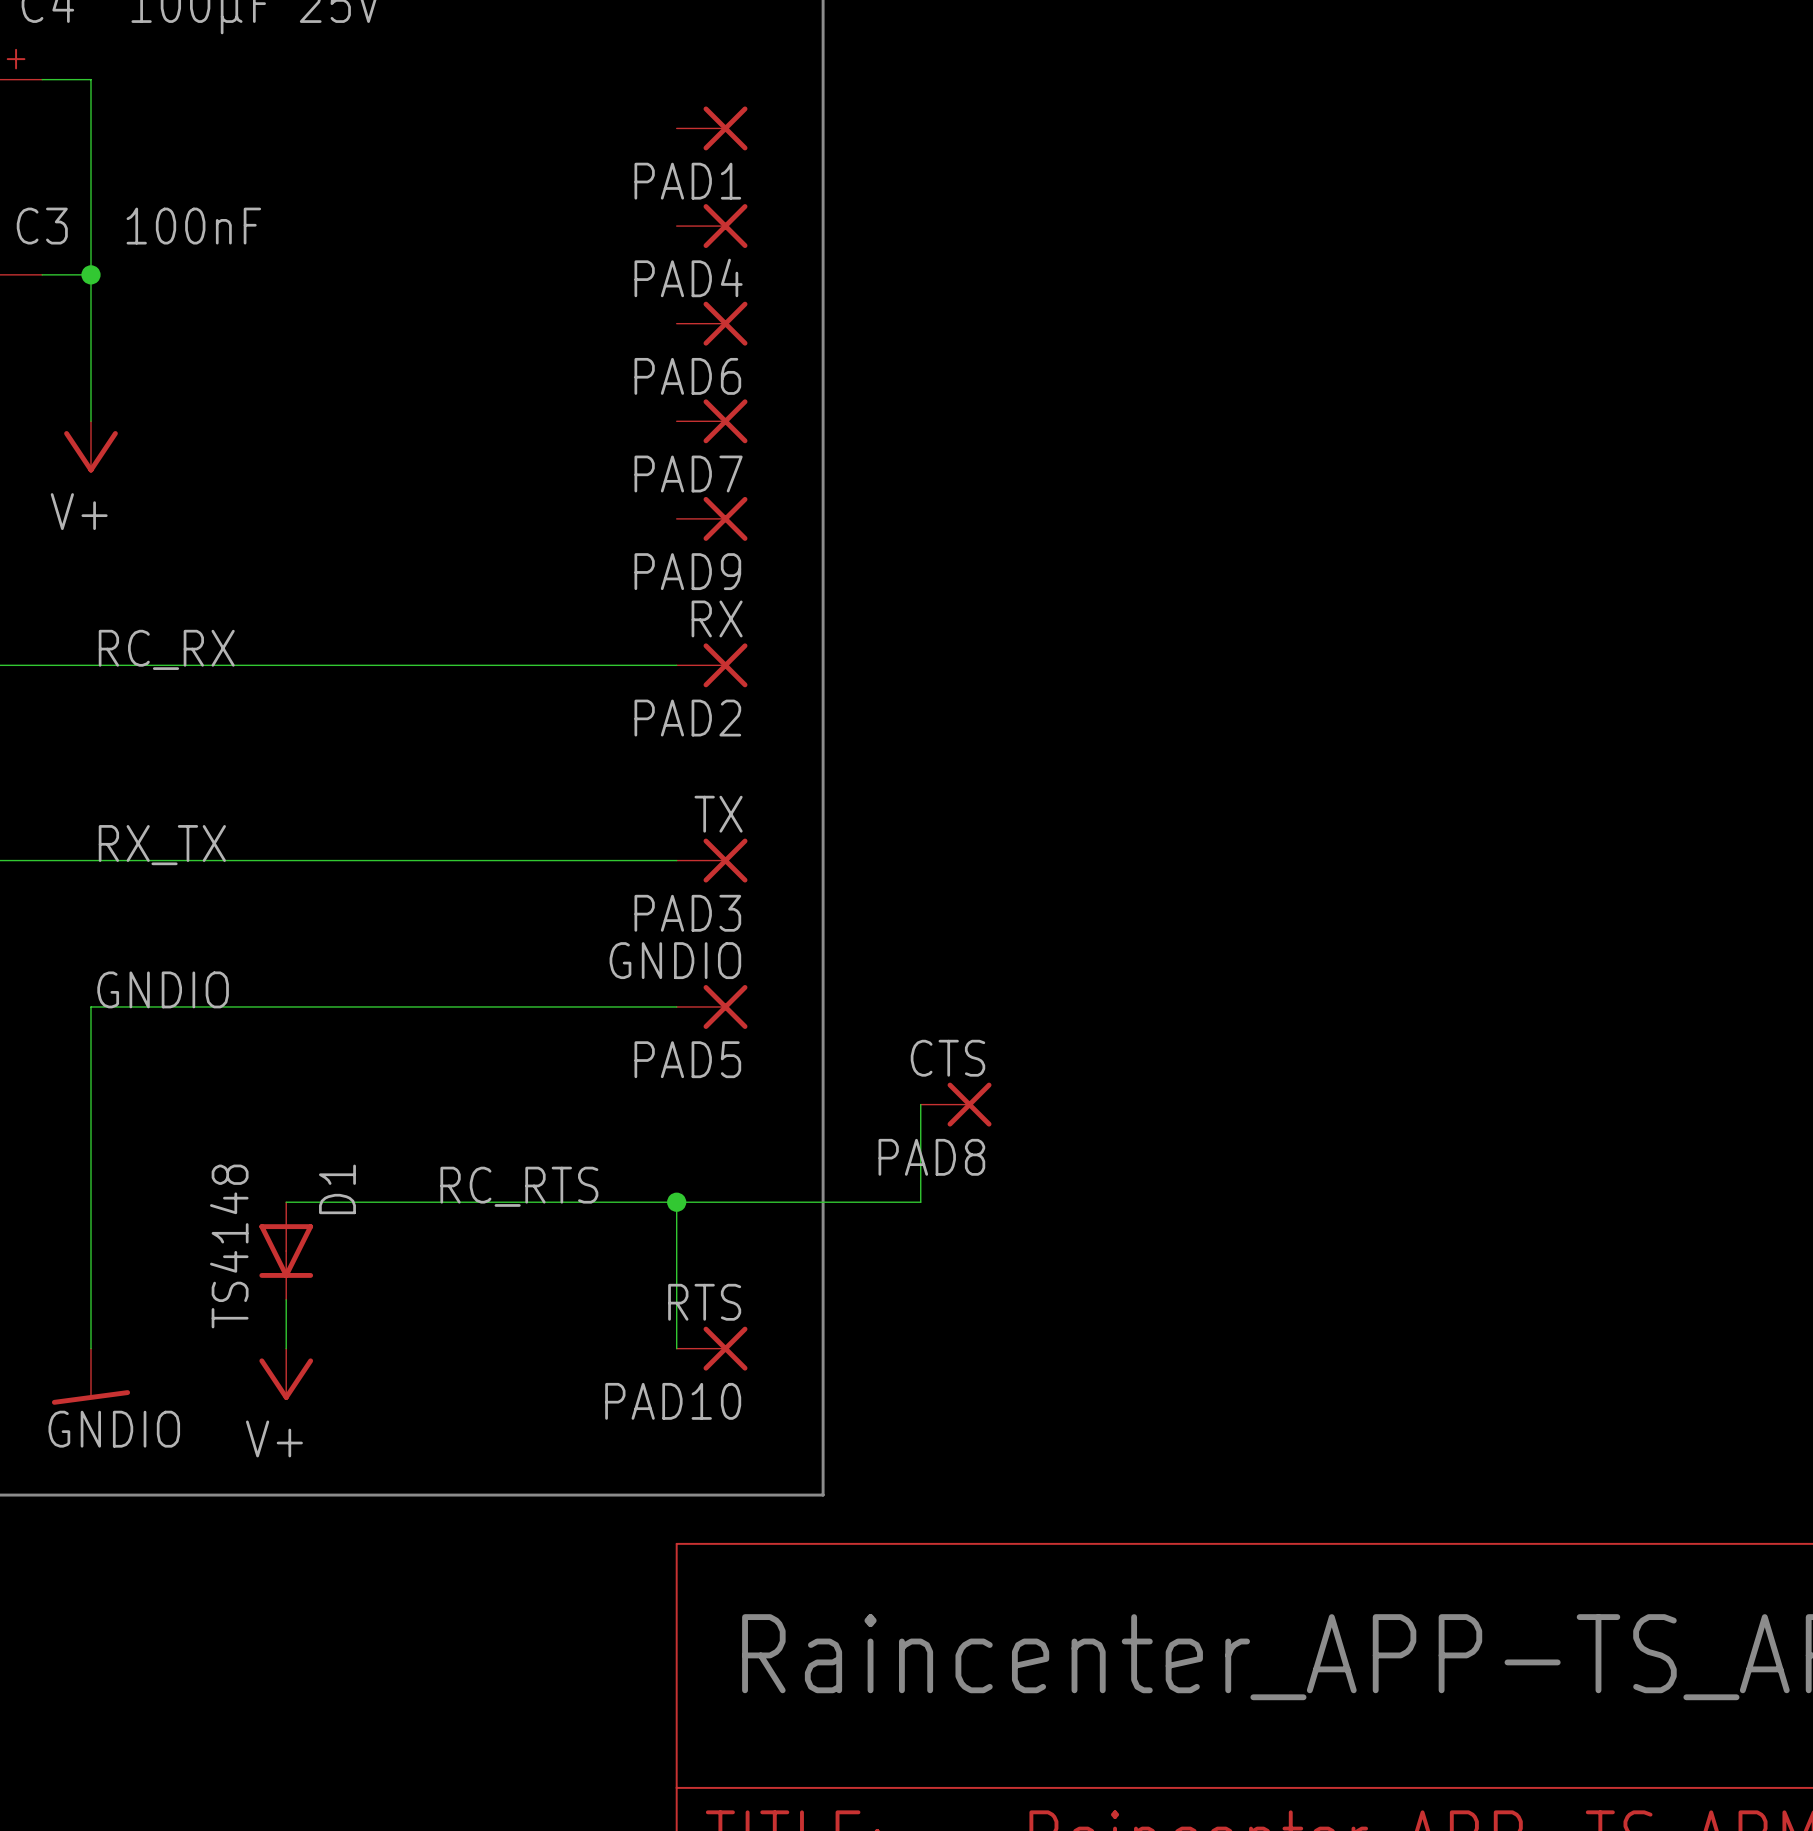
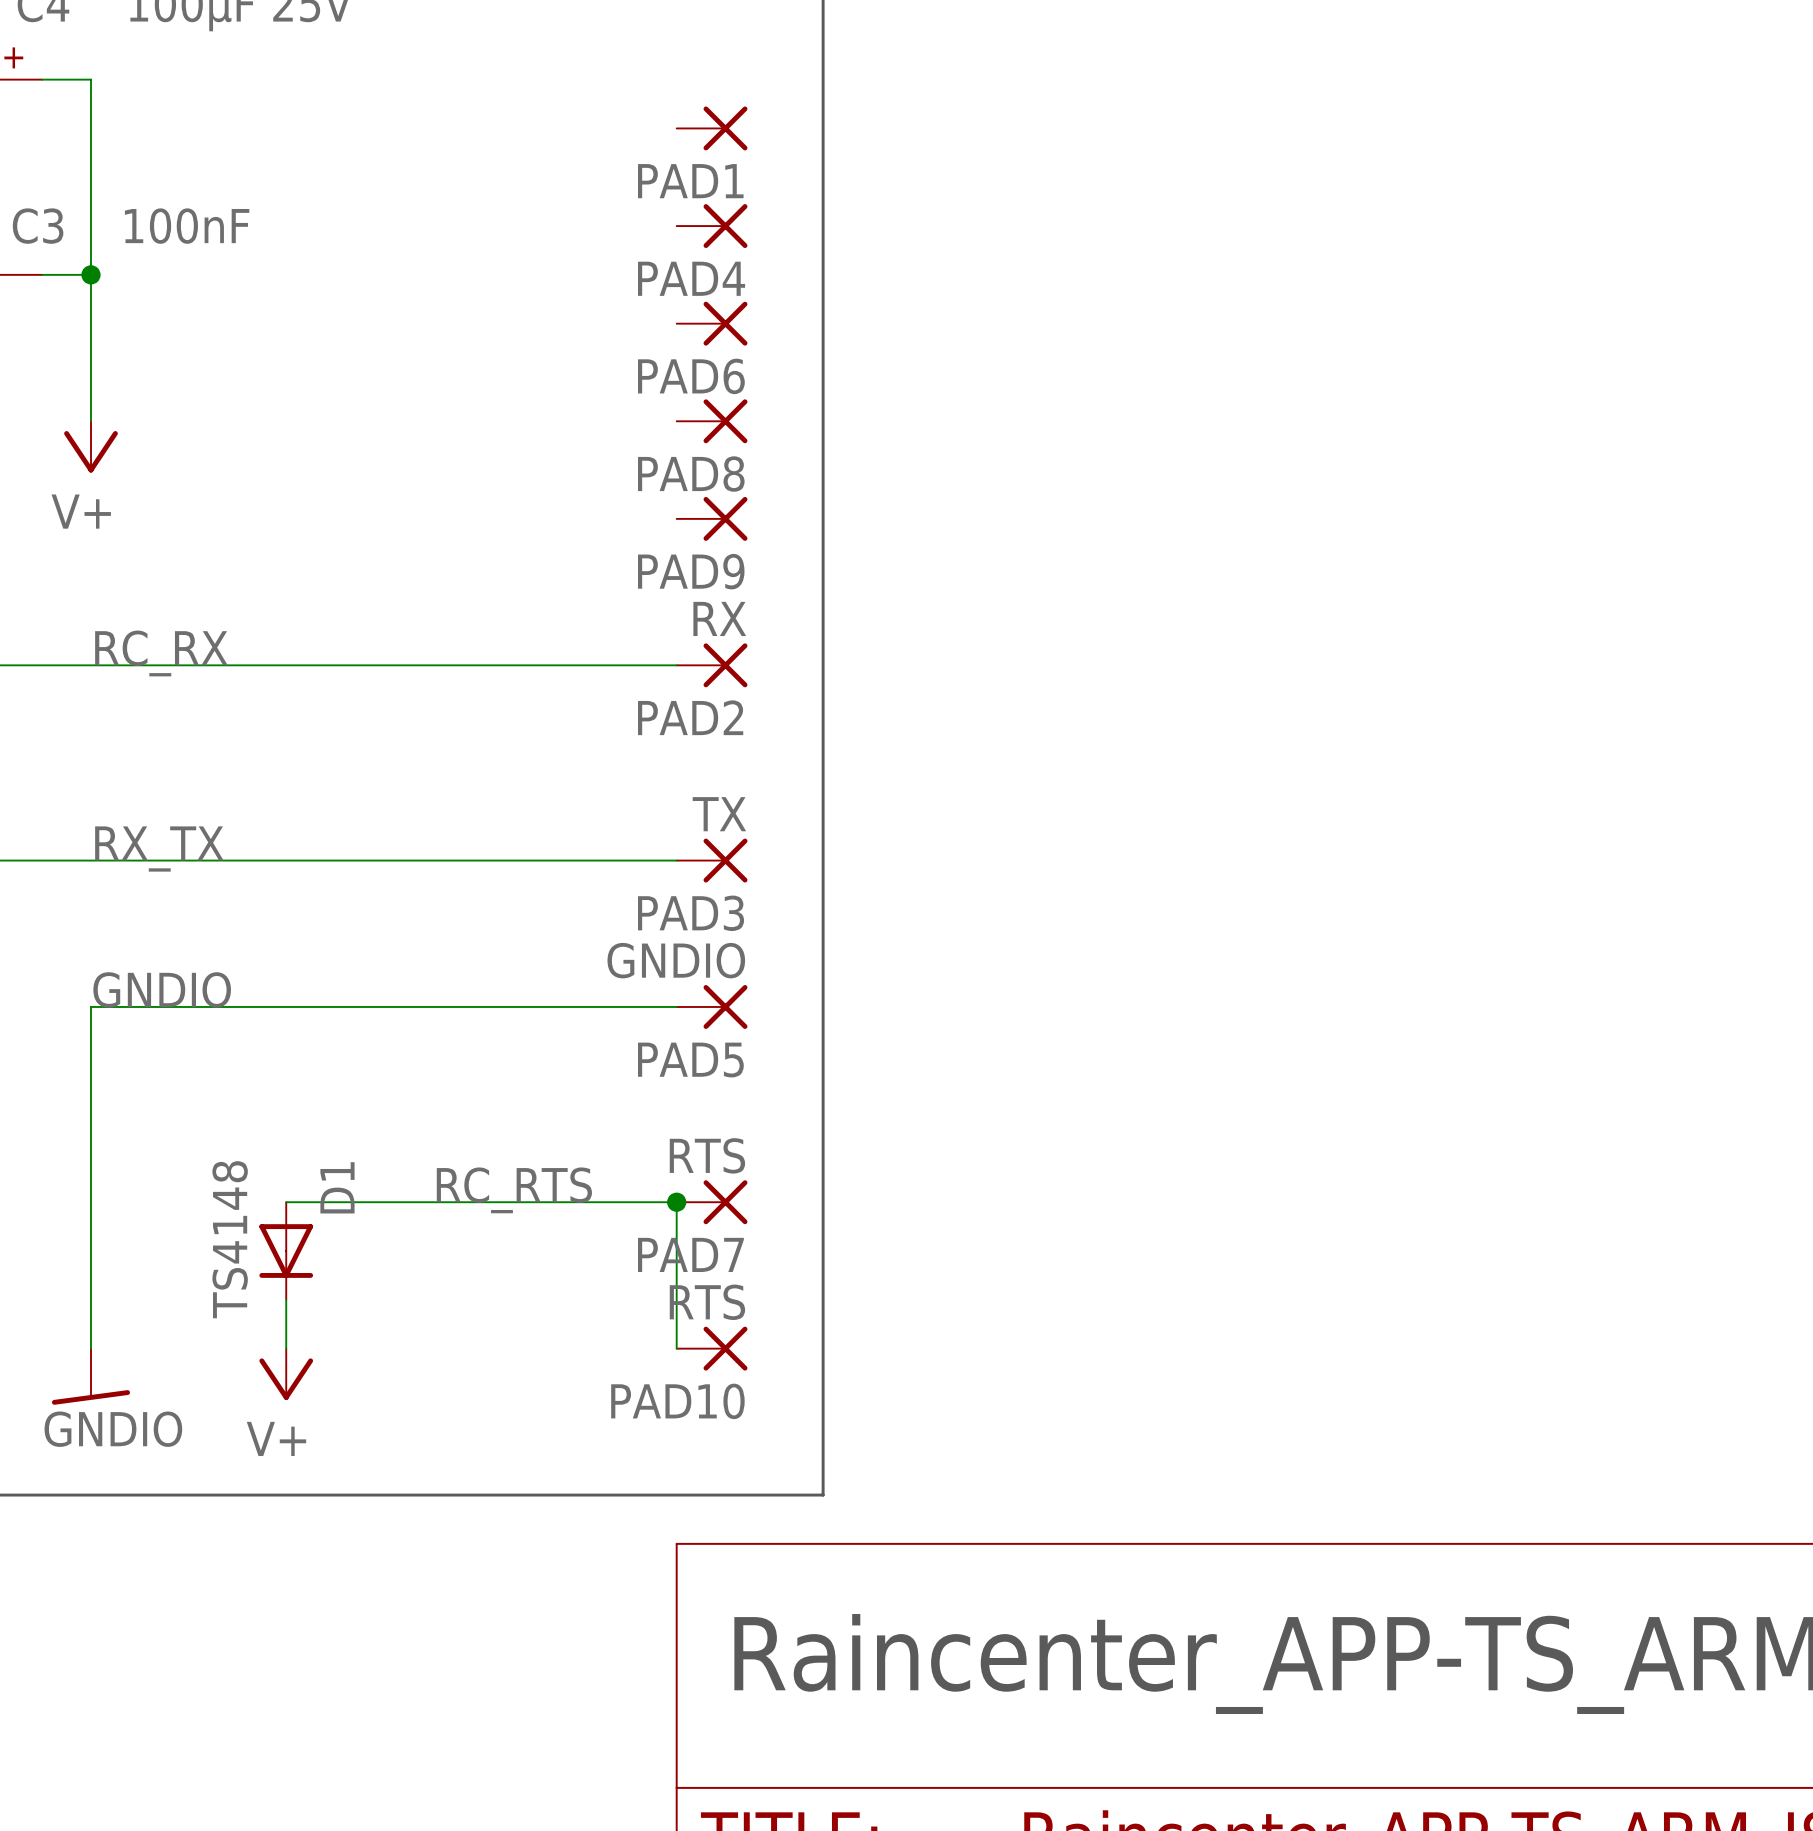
PAD7 name: PAD7 (688, 474) -> PAD8 (691, 474)
wire: (920, 1104) (920, 1202) (676, 1202) -> none
PAD8: CTS (956, 1104) -> none
PAD7: none -> RTS (712, 1202)

